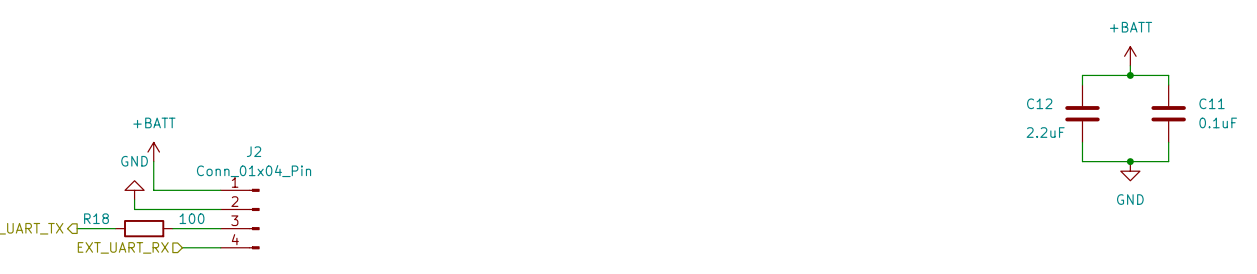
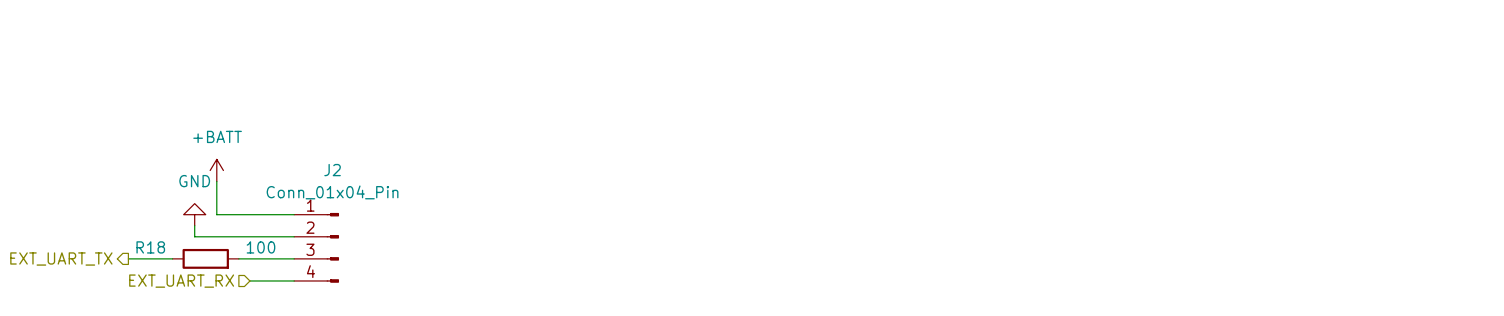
power symbol: +BATT (1130, 56) -> none
wire: (1130, 65) (1130, 75) -> none
junction: (1130, 75) -> none
wire: (1082, 85) (1082, 75) (1168, 75) (1168, 85) -> none
C12: 2.2uF (1082, 113) -> none
C11: 0.1uF (1168, 113) -> none
wire: (1082, 142) (1082, 161) (1168, 161) (1168, 142) -> none
junction: (1130, 161) -> none
power symbol: GND (1130, 171) -> none

